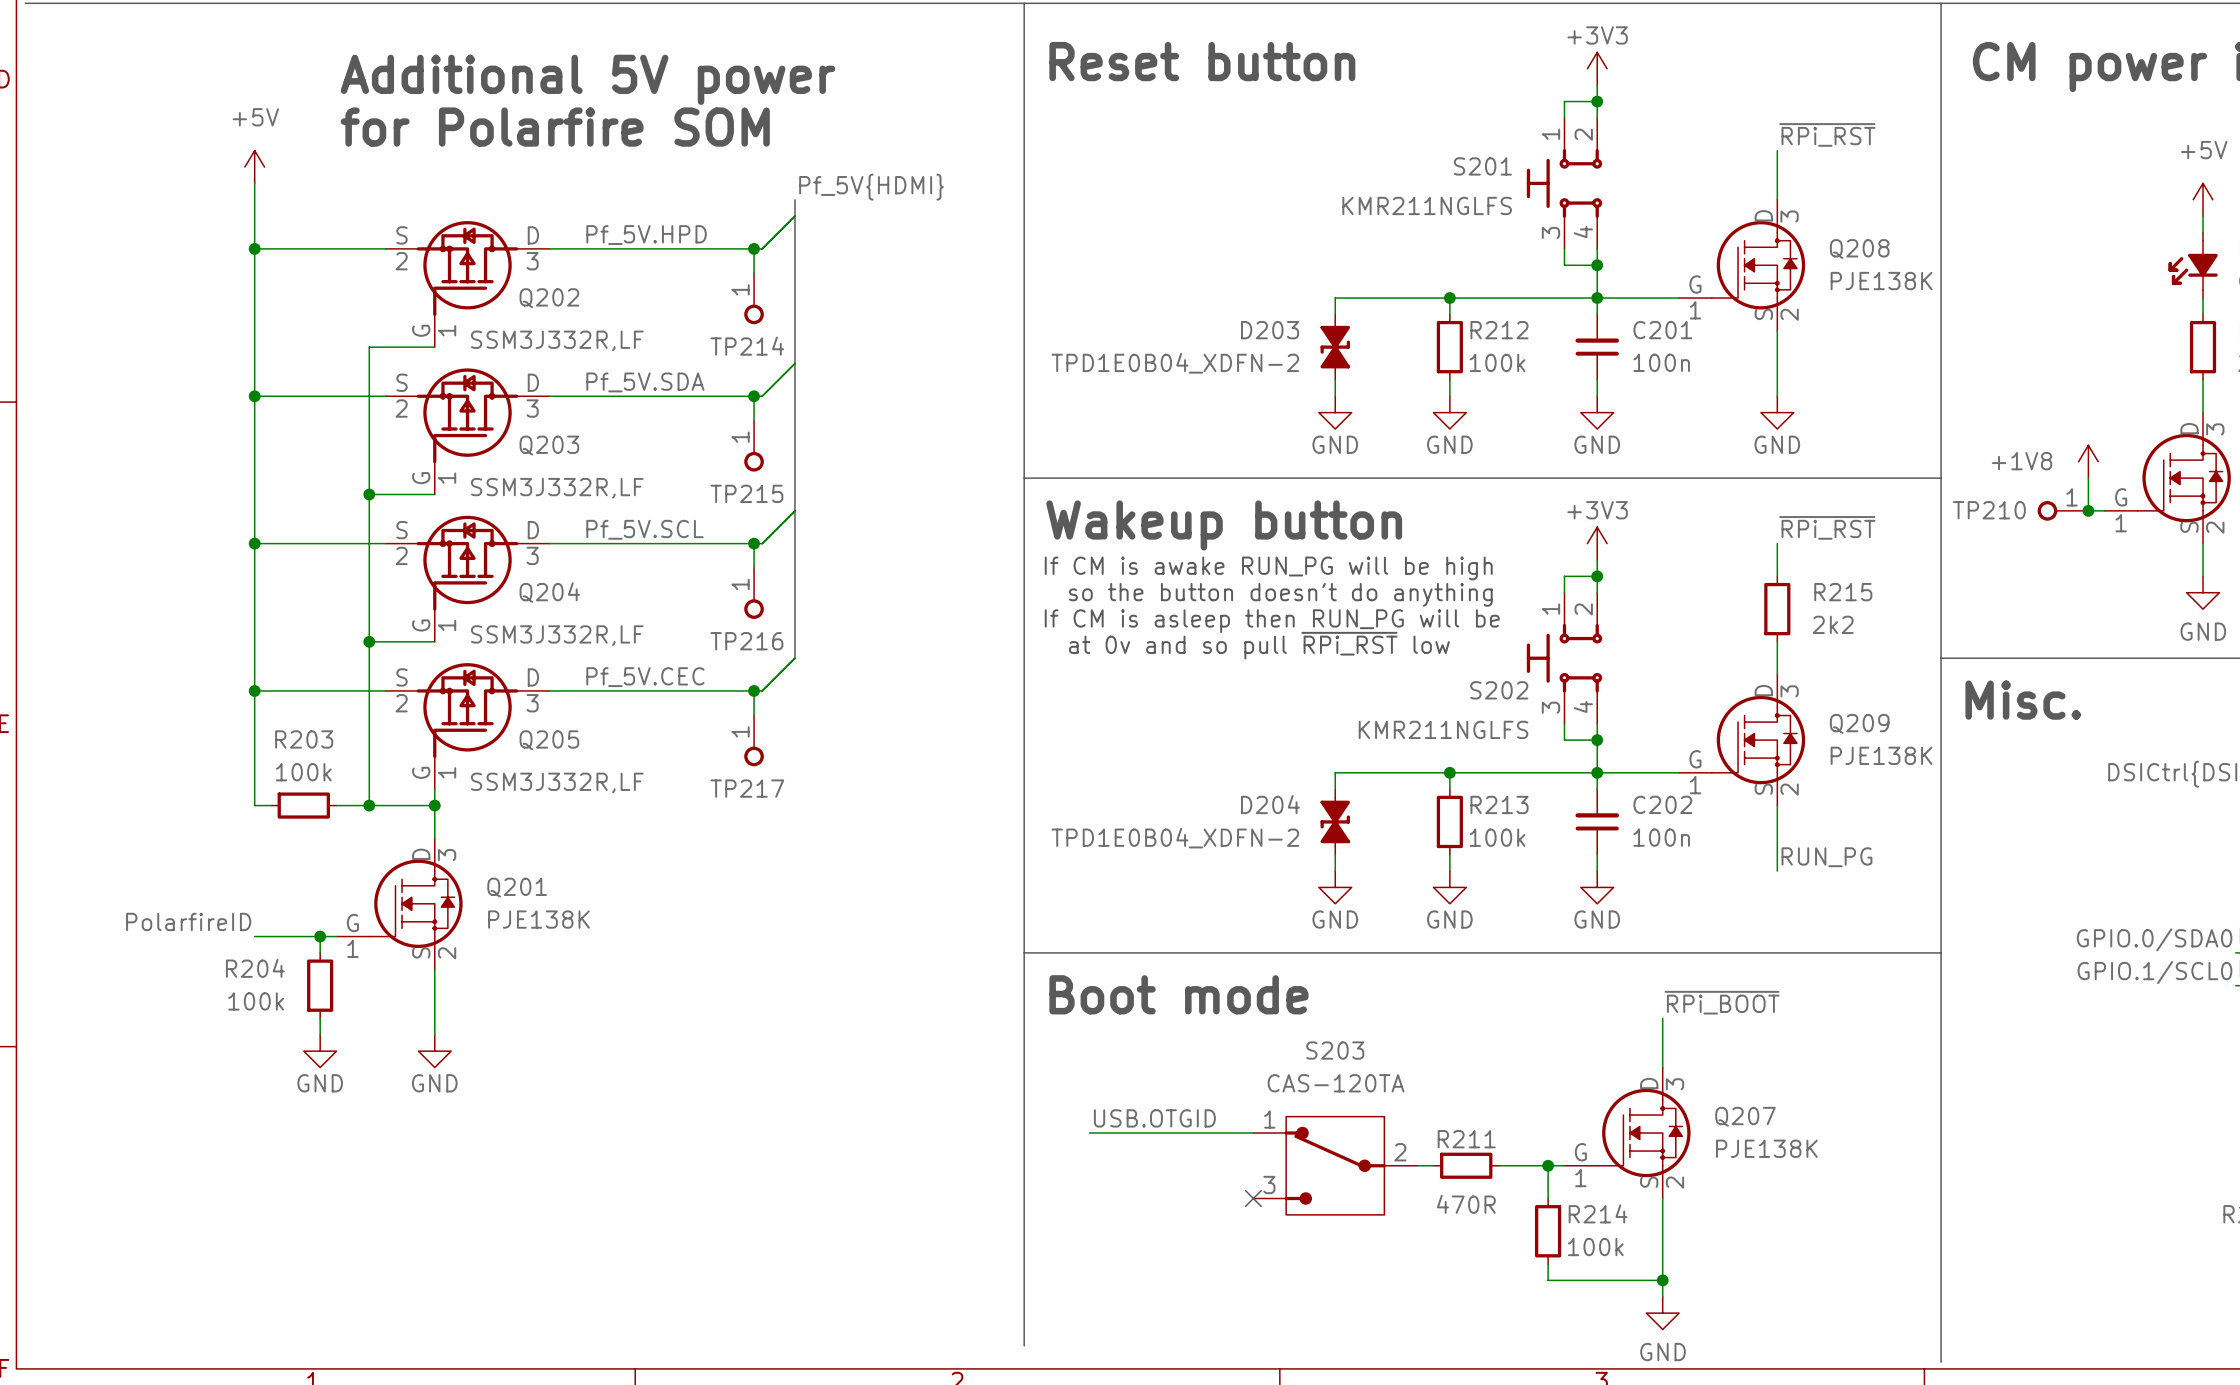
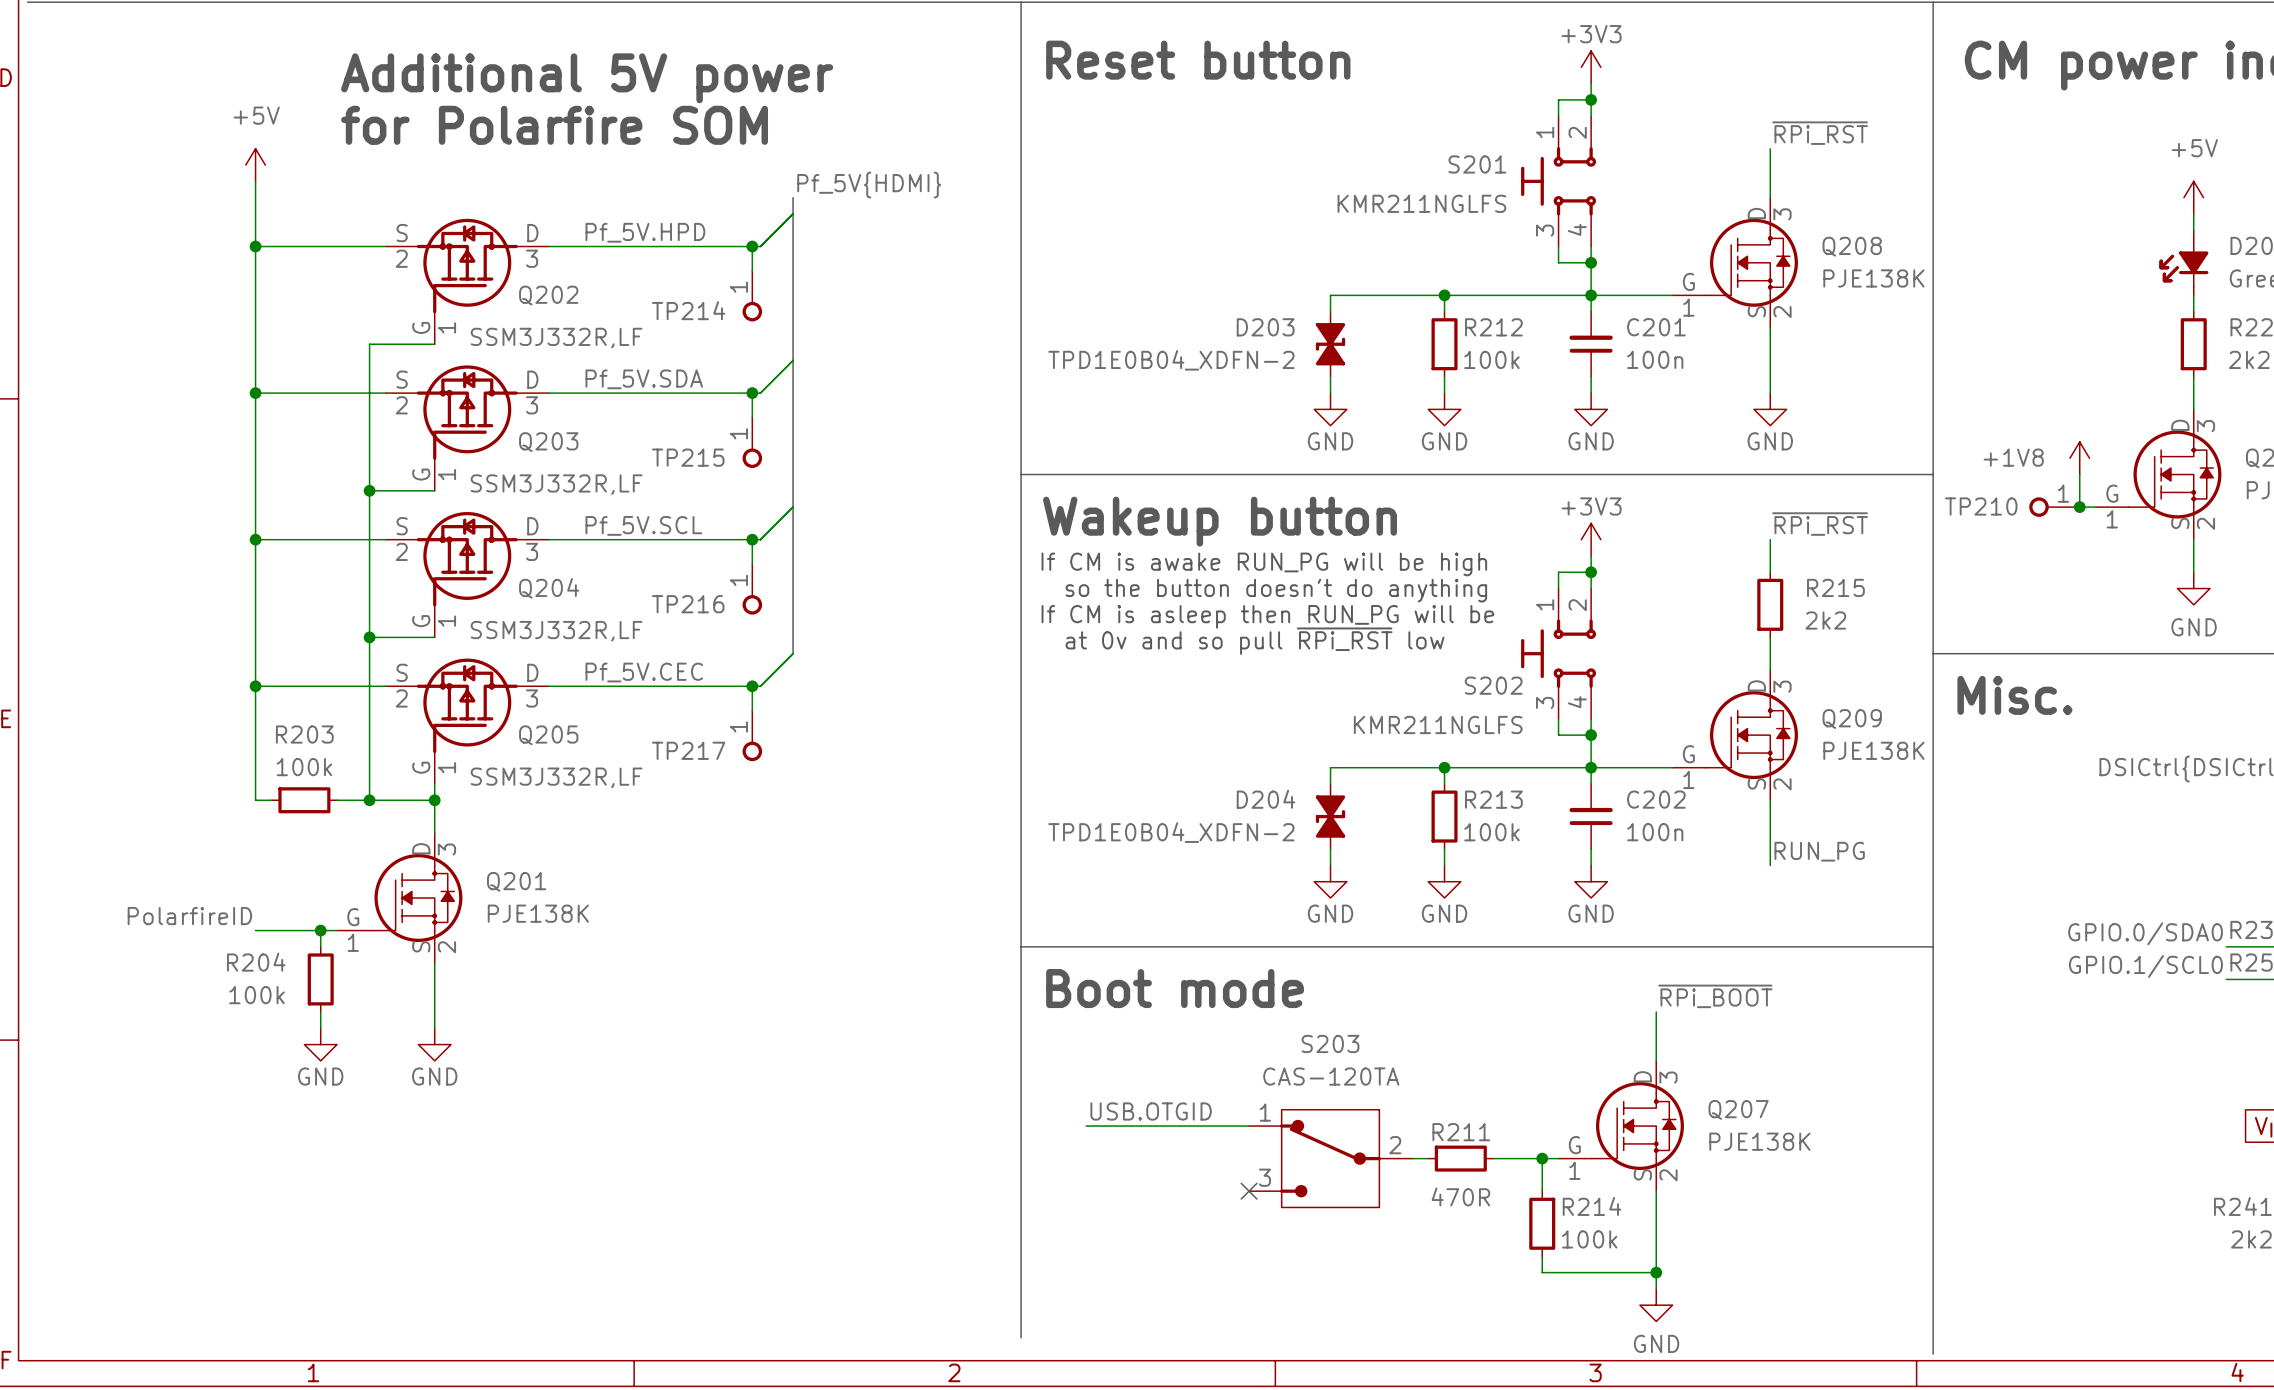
TP214 name position: TP214 (747, 346) -> TP214 (688, 310)
TP215 name position: TP215 (746, 493) -> TP215 (688, 457)
TP216 name position: TP216 (746, 641) -> TP216 (688, 604)
TP217 name position: TP217 (747, 788) -> TP217 (688, 750)

